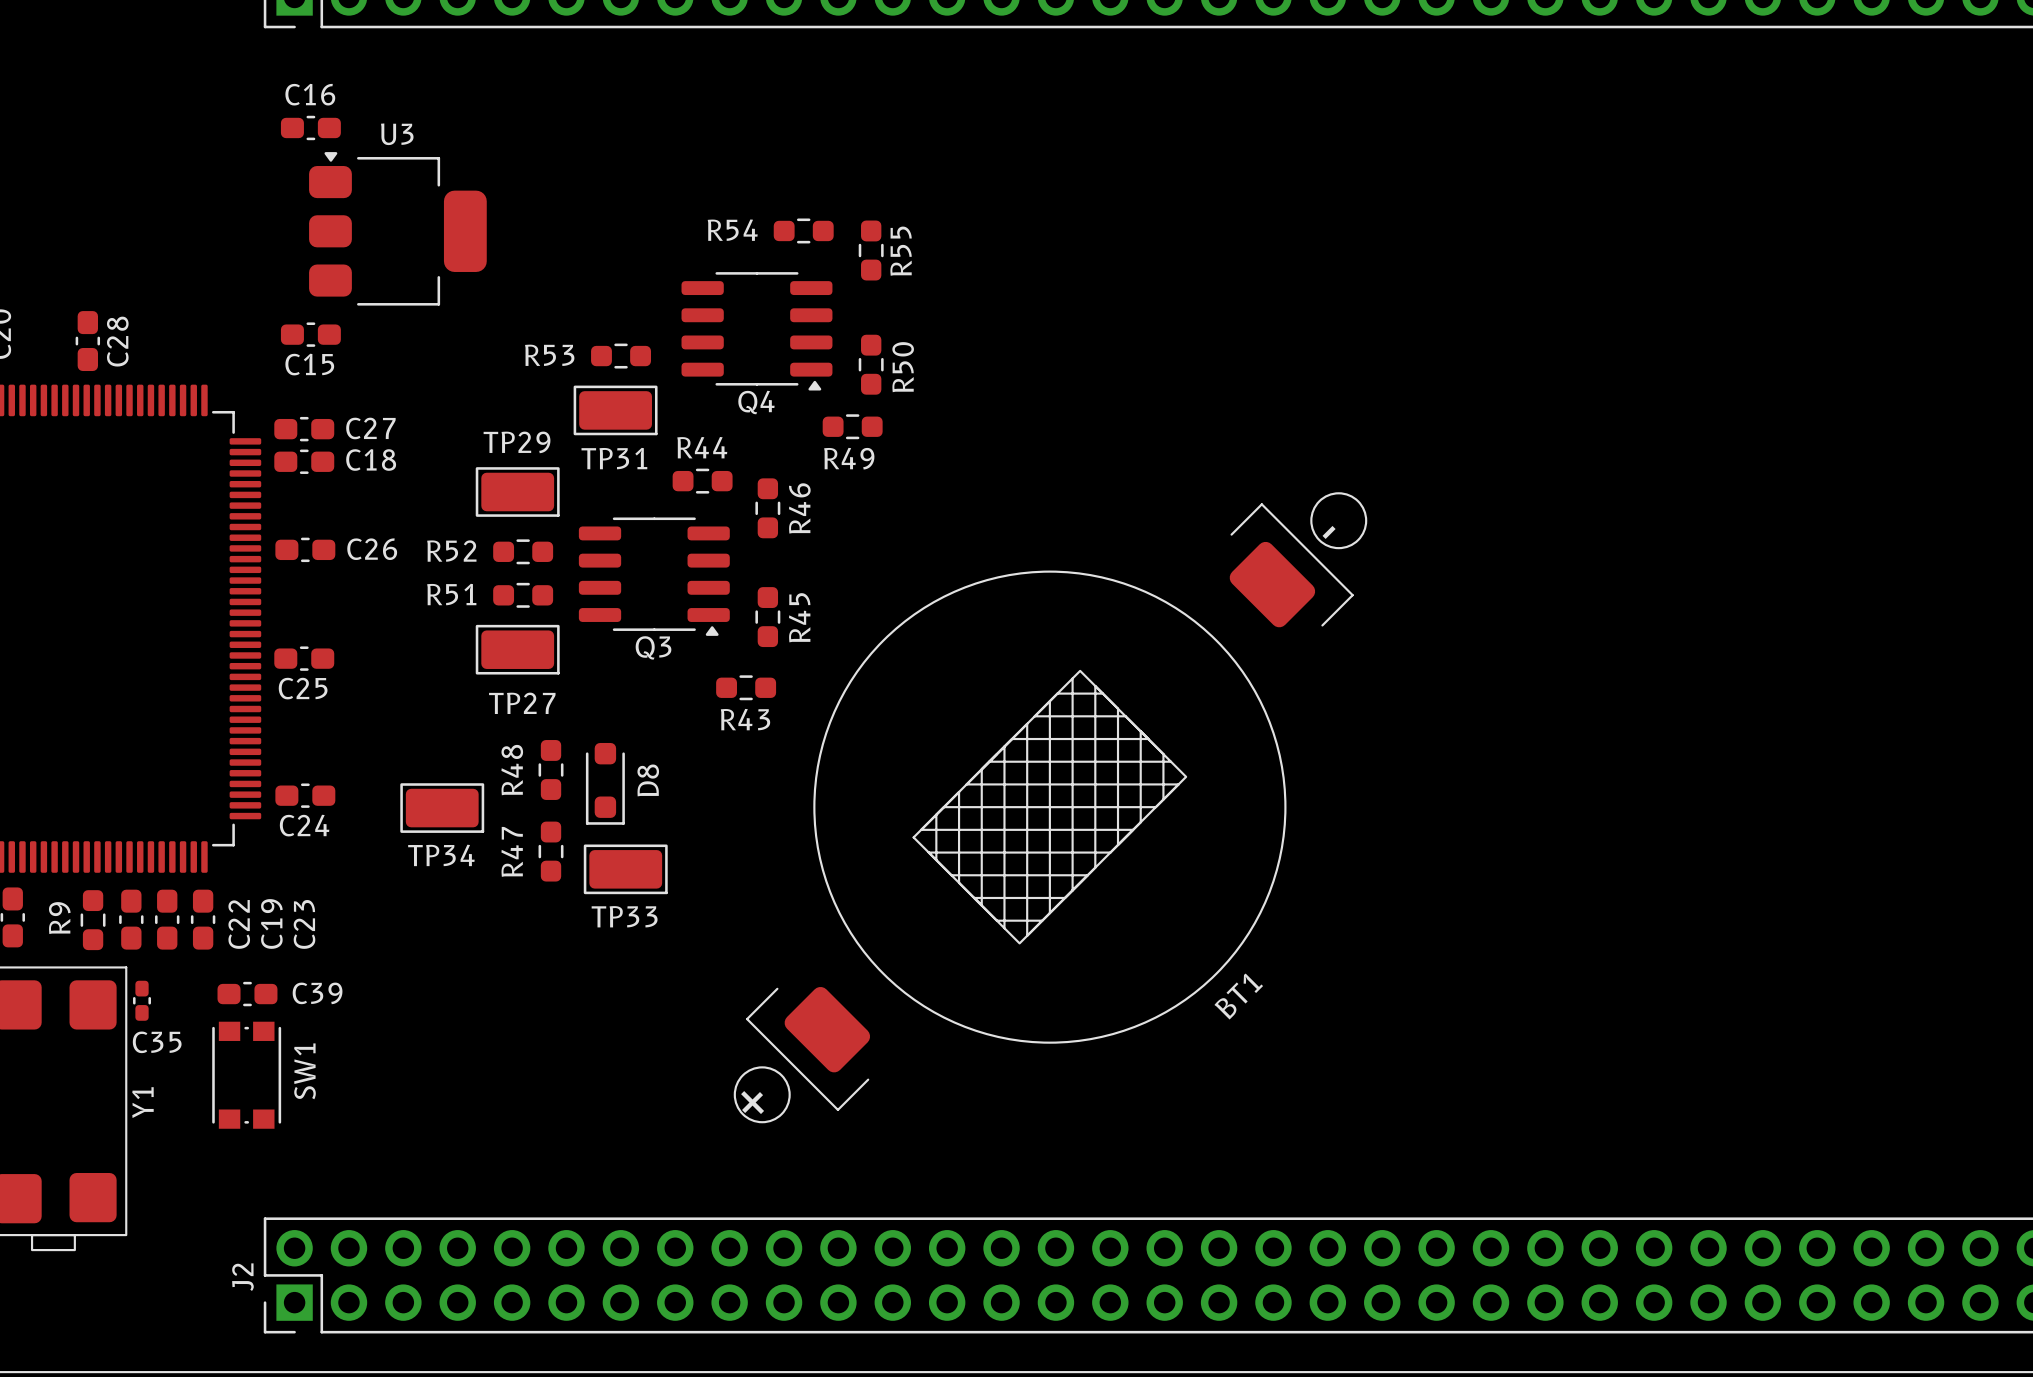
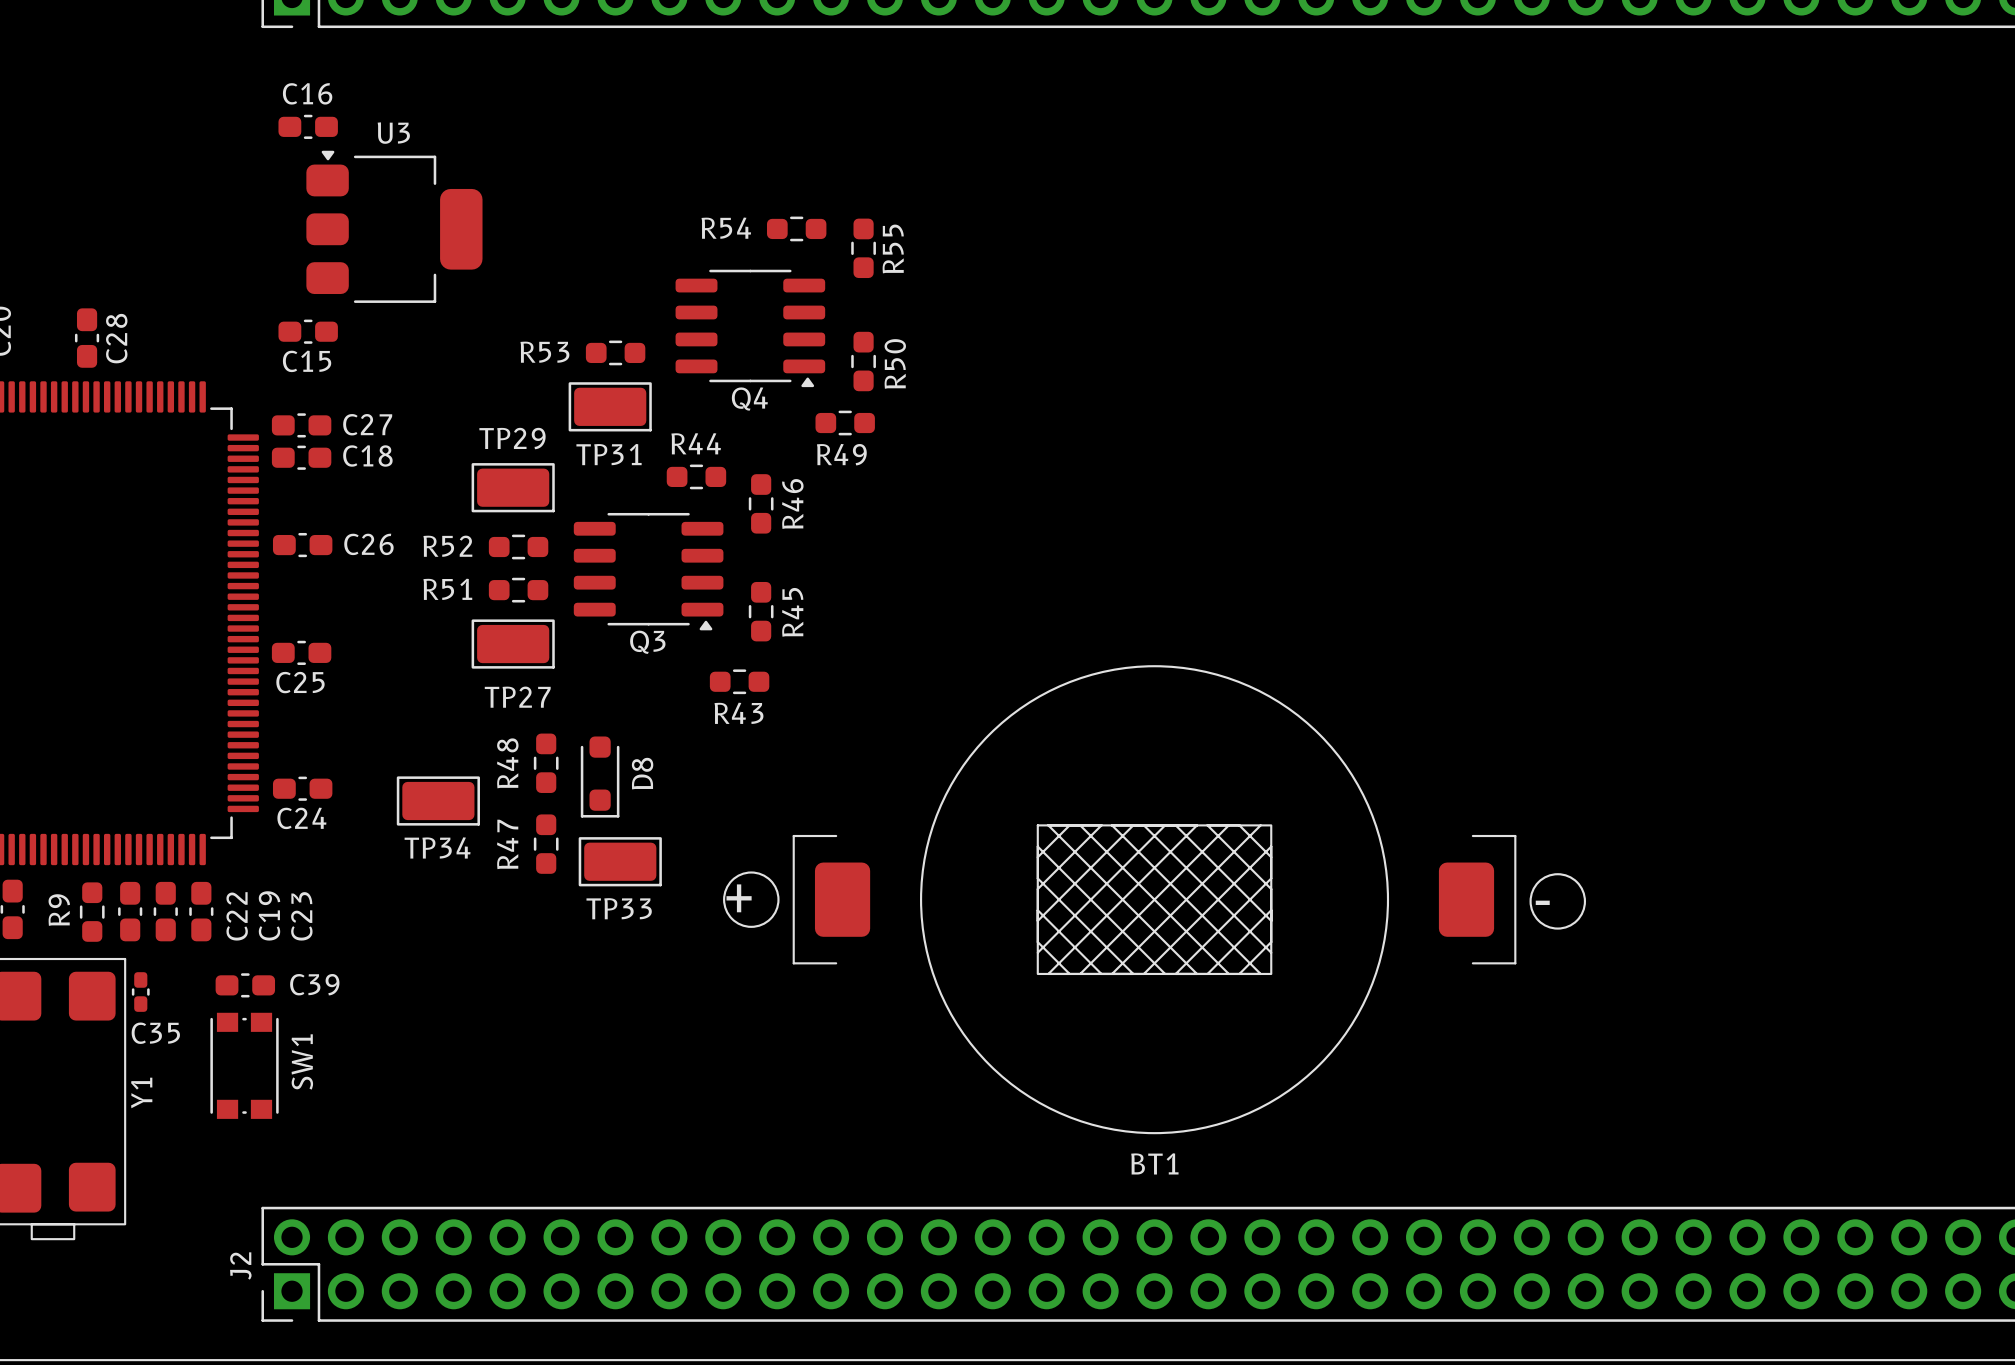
BT1 rotation: 0° (1050, 807) -> 45° clockwise (1154, 899)

